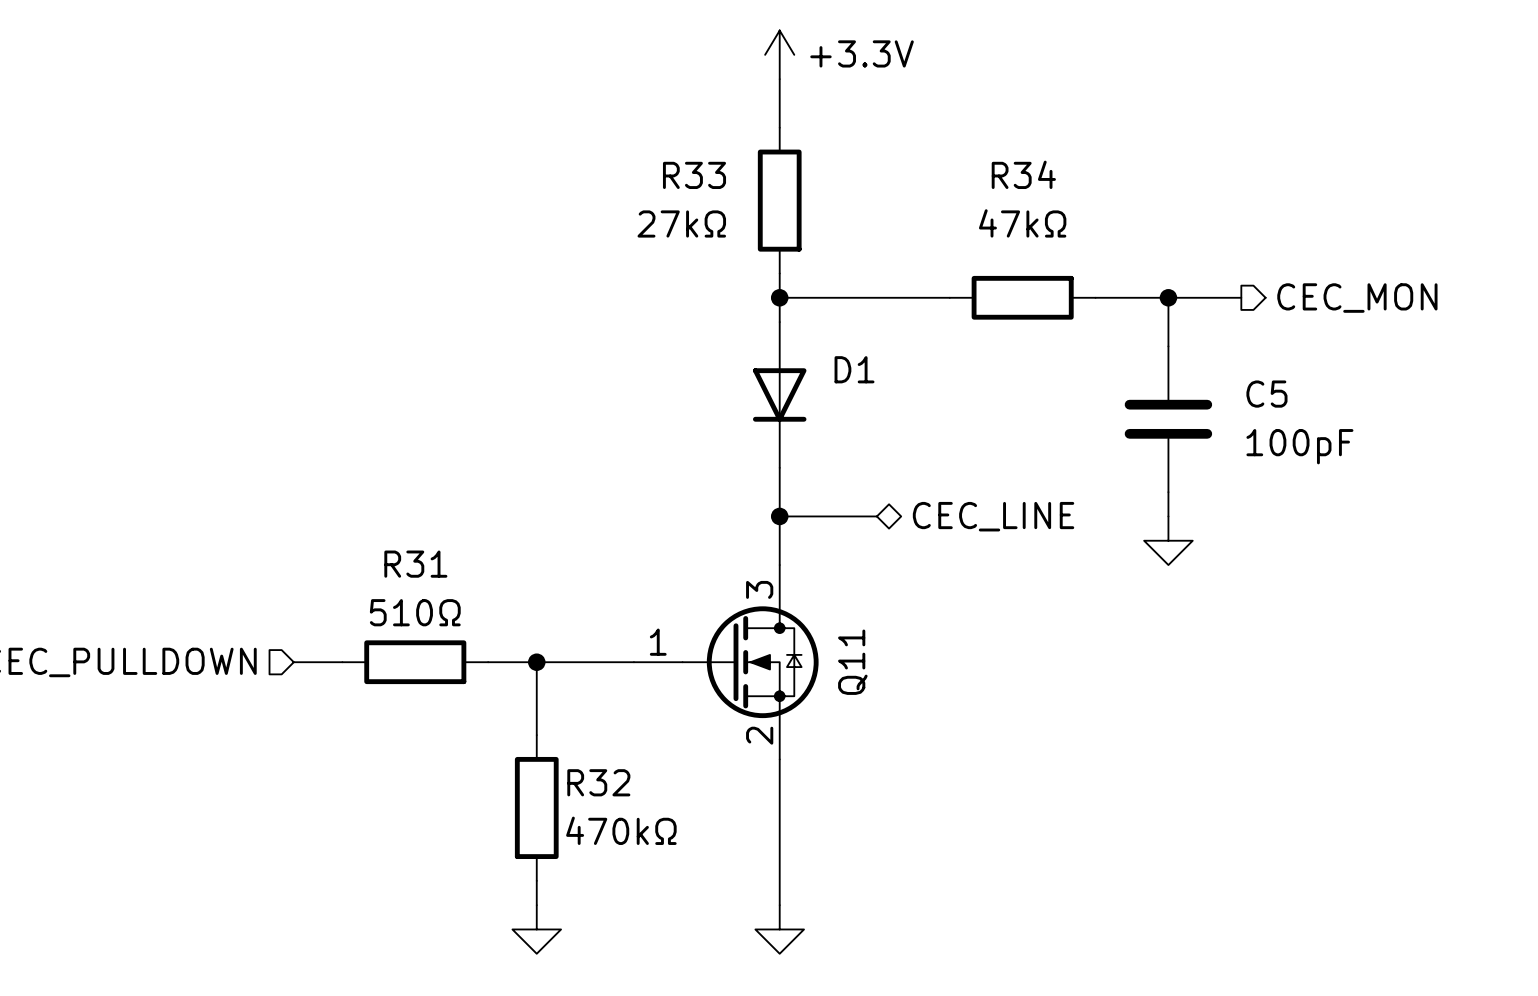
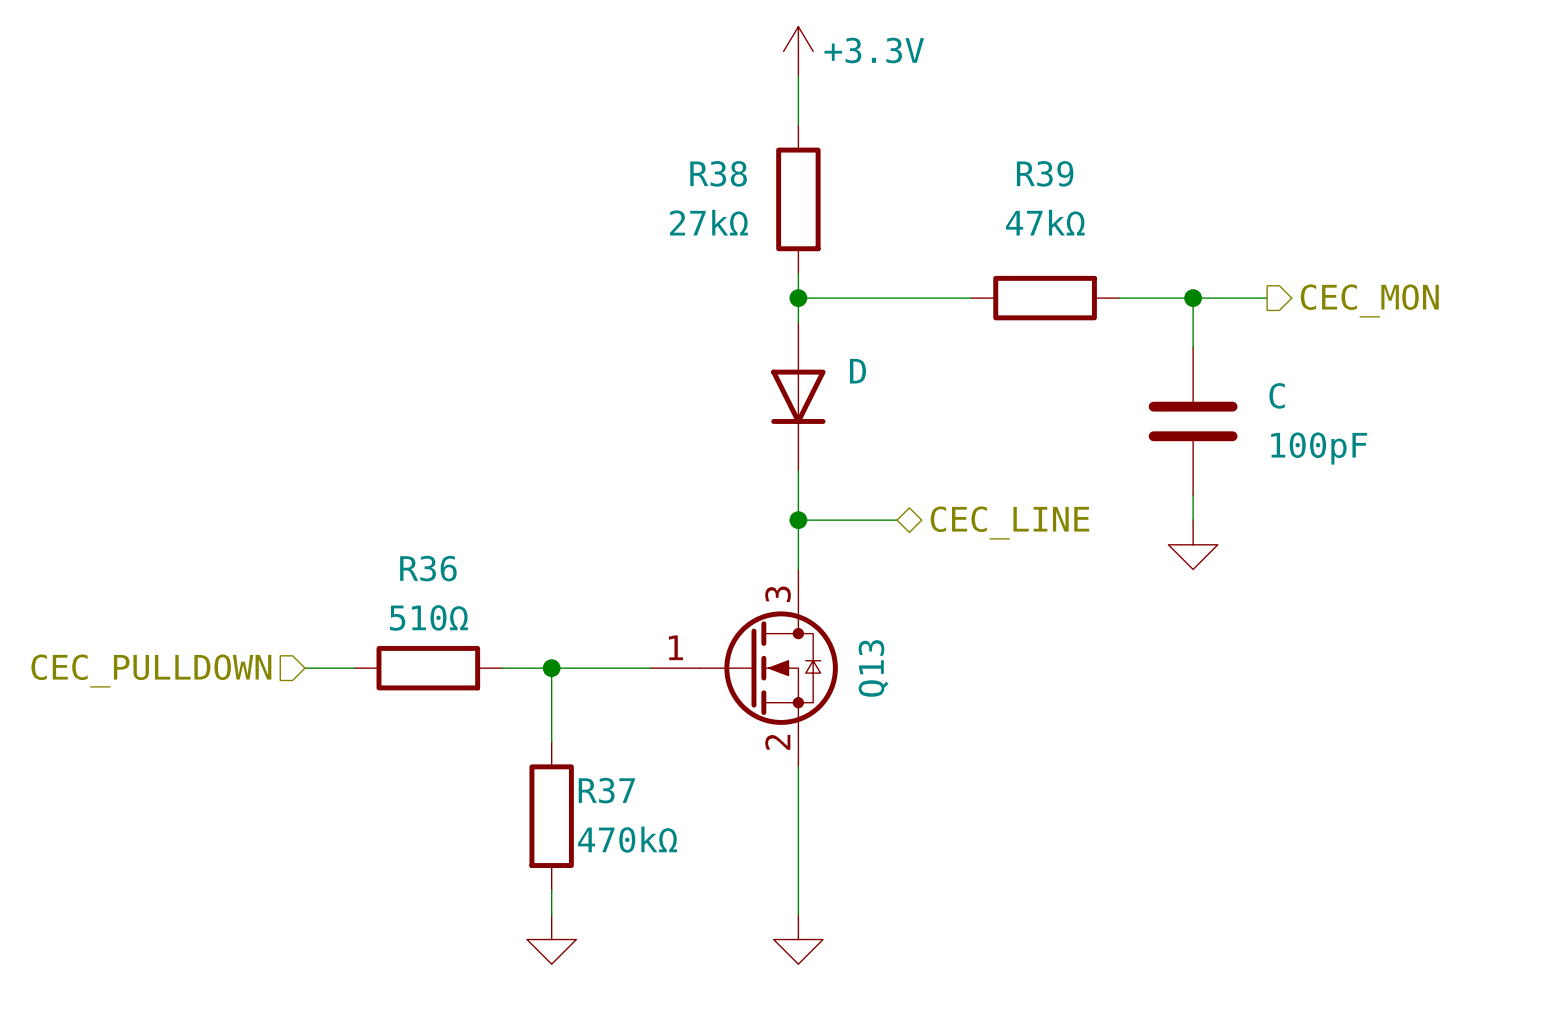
R34 name: R34 (1023, 174) -> R39 (1045, 173)
R33 name: R33 (694, 175) -> R38 (718, 173)
D1 name: D1 (854, 369) -> D (857, 371)
C5 name: C5 (1266, 394) -> C (1277, 395)
R31 name: R31 (415, 564) -> R36 (428, 568)
Q11 name: Q11 (852, 662) -> Q13 (873, 668)
R32 name: R32 (598, 782) -> R37 (606, 790)

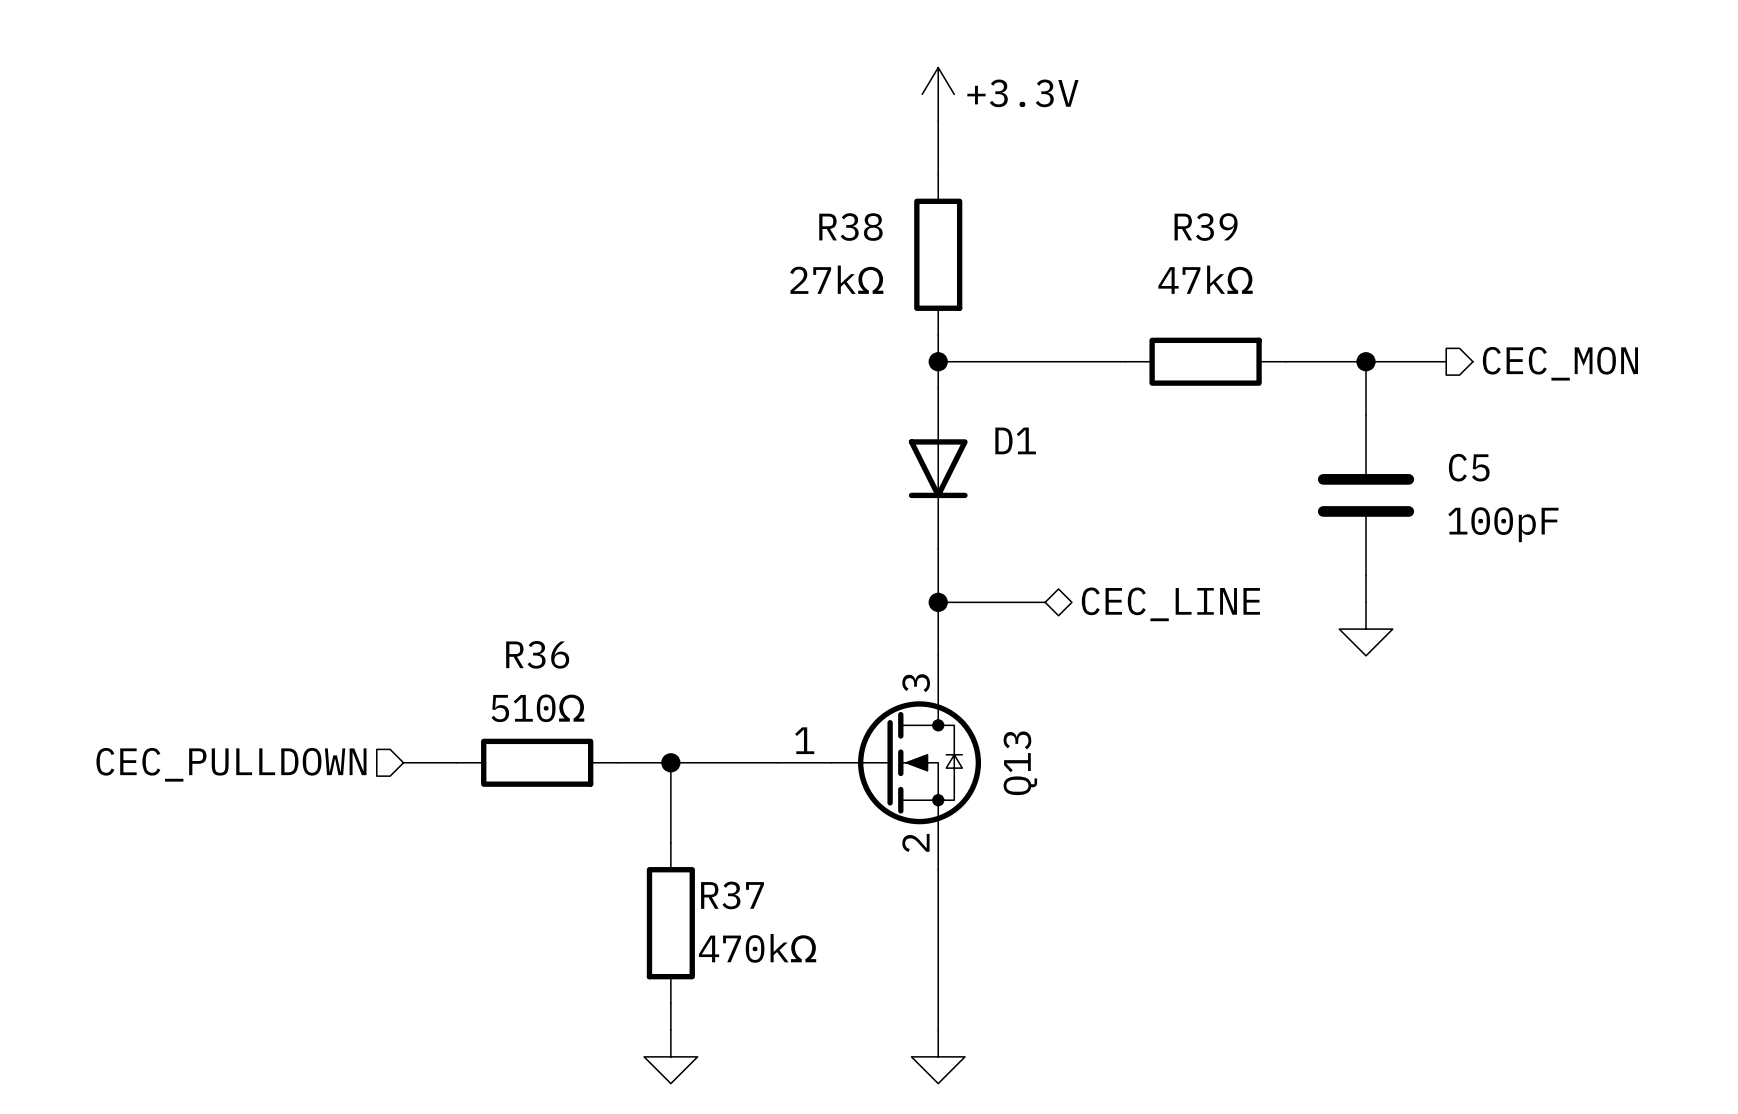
D name: D (857, 371) -> D1 (1015, 440)
C name: C (1277, 395) -> C5 (1469, 467)

